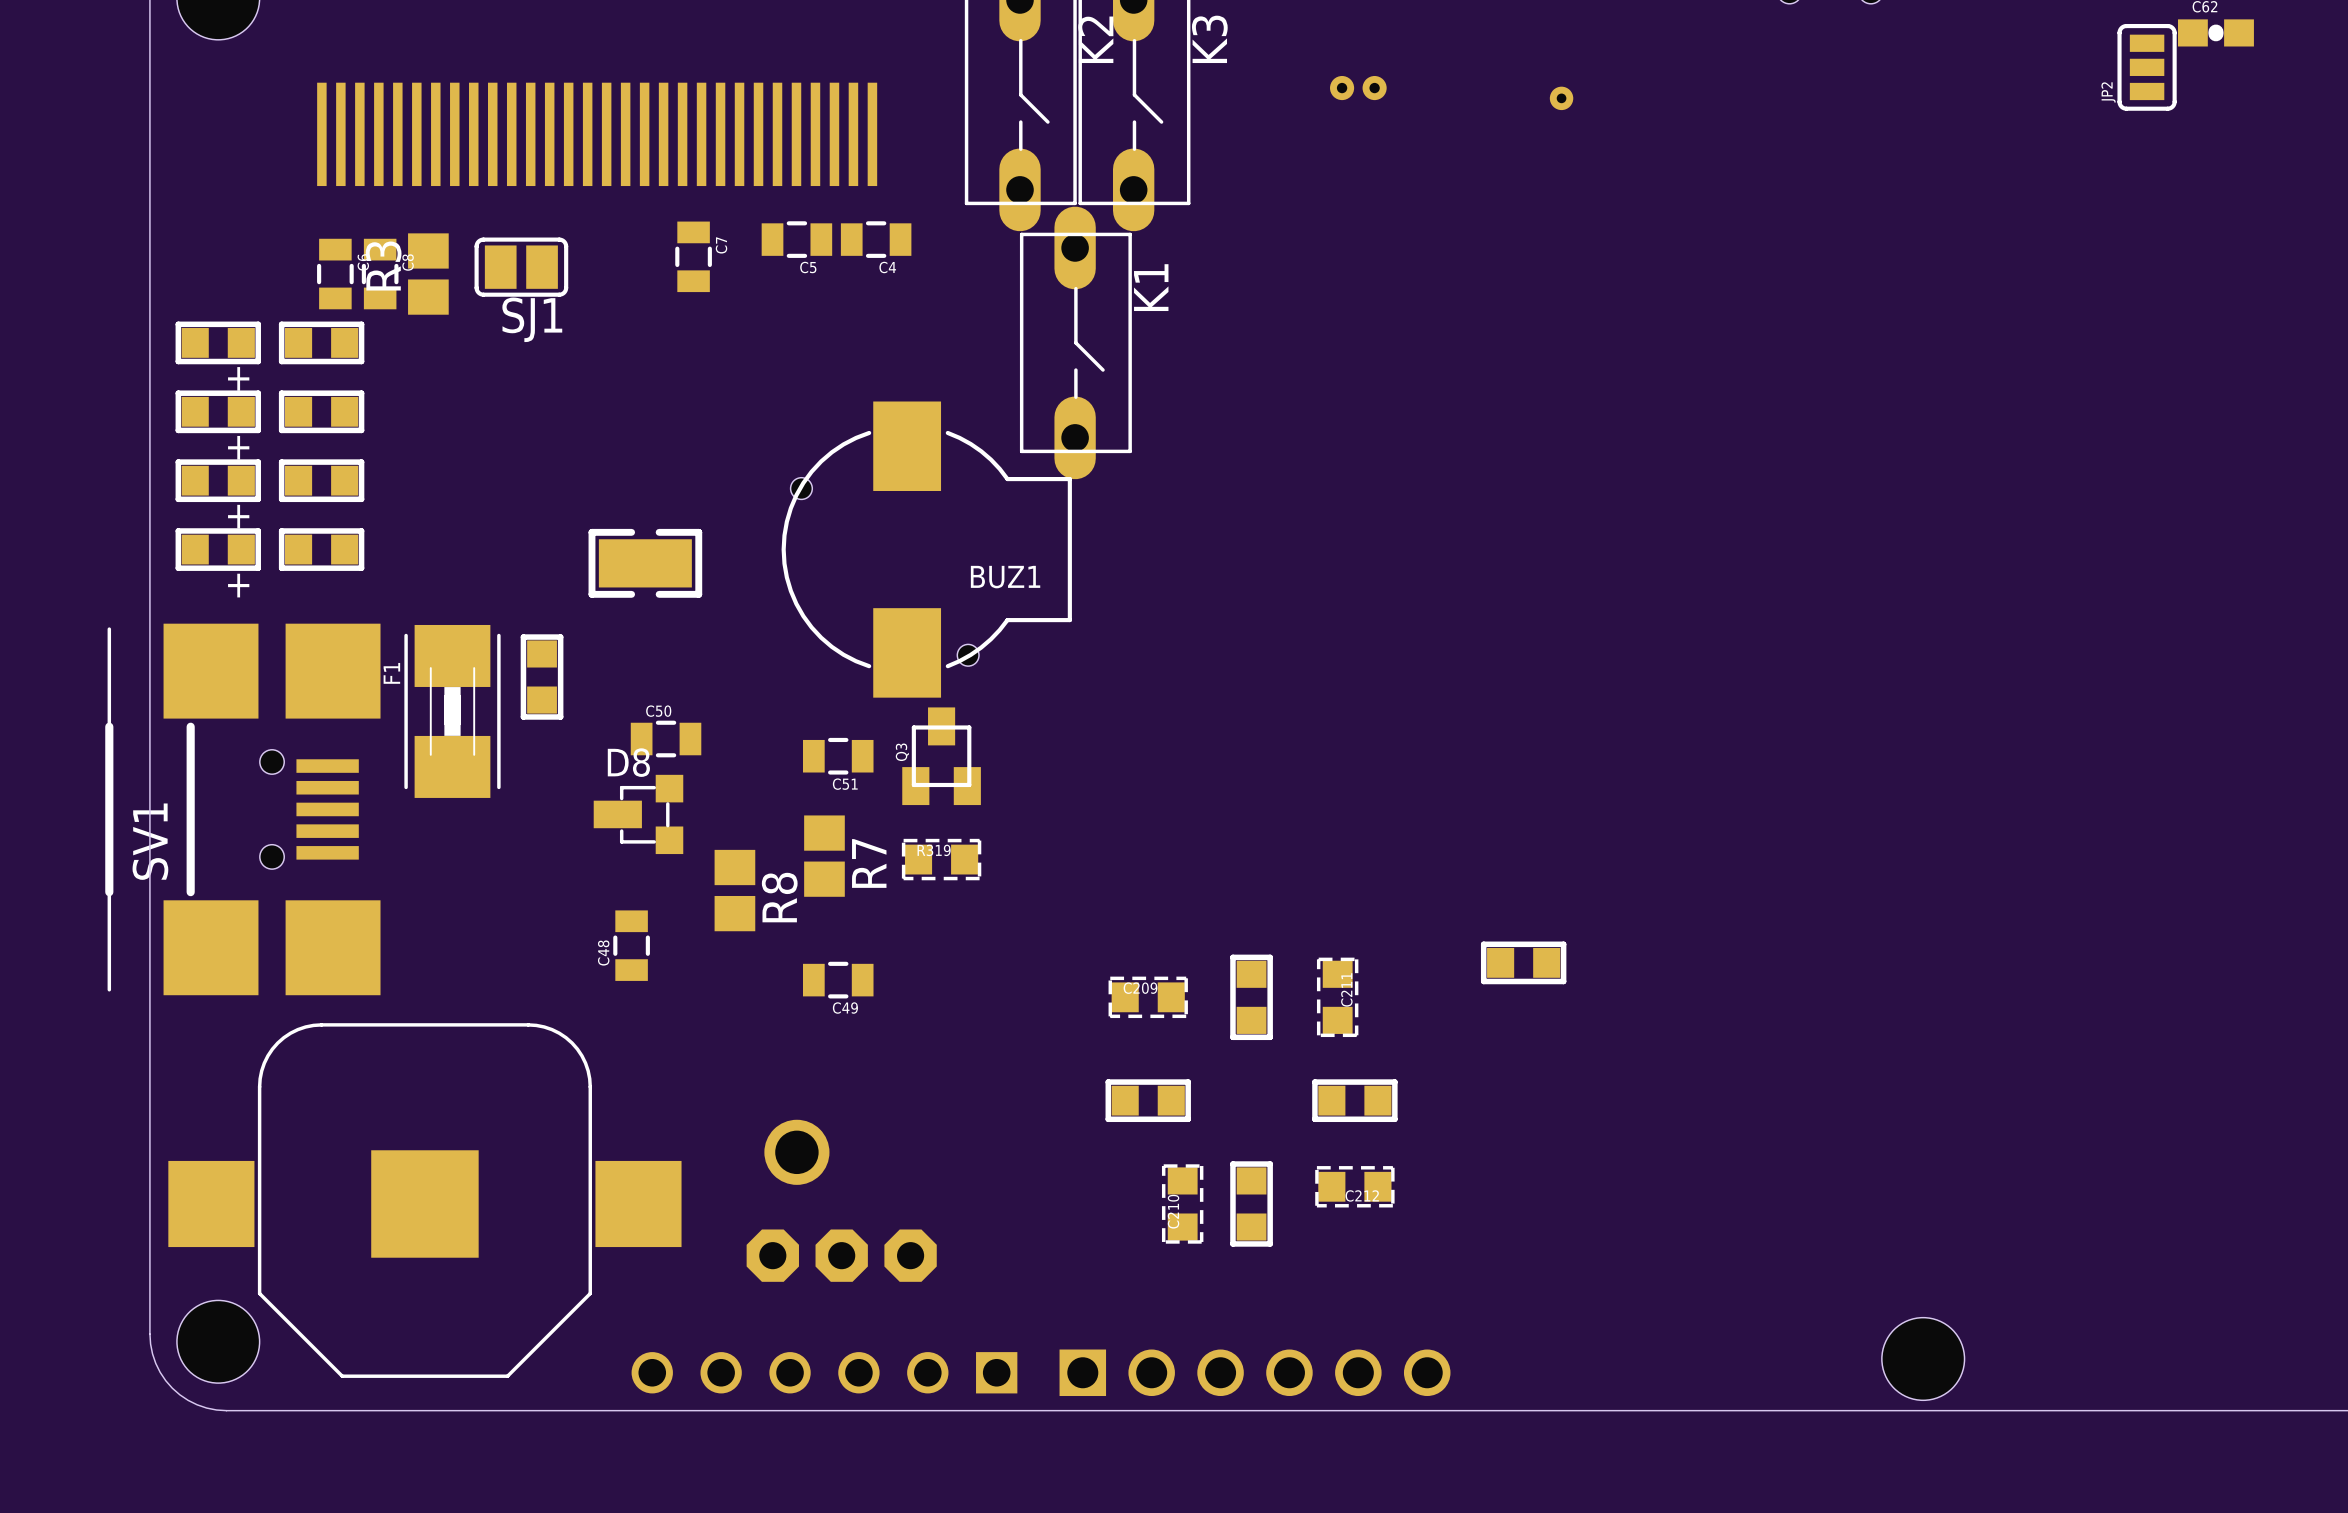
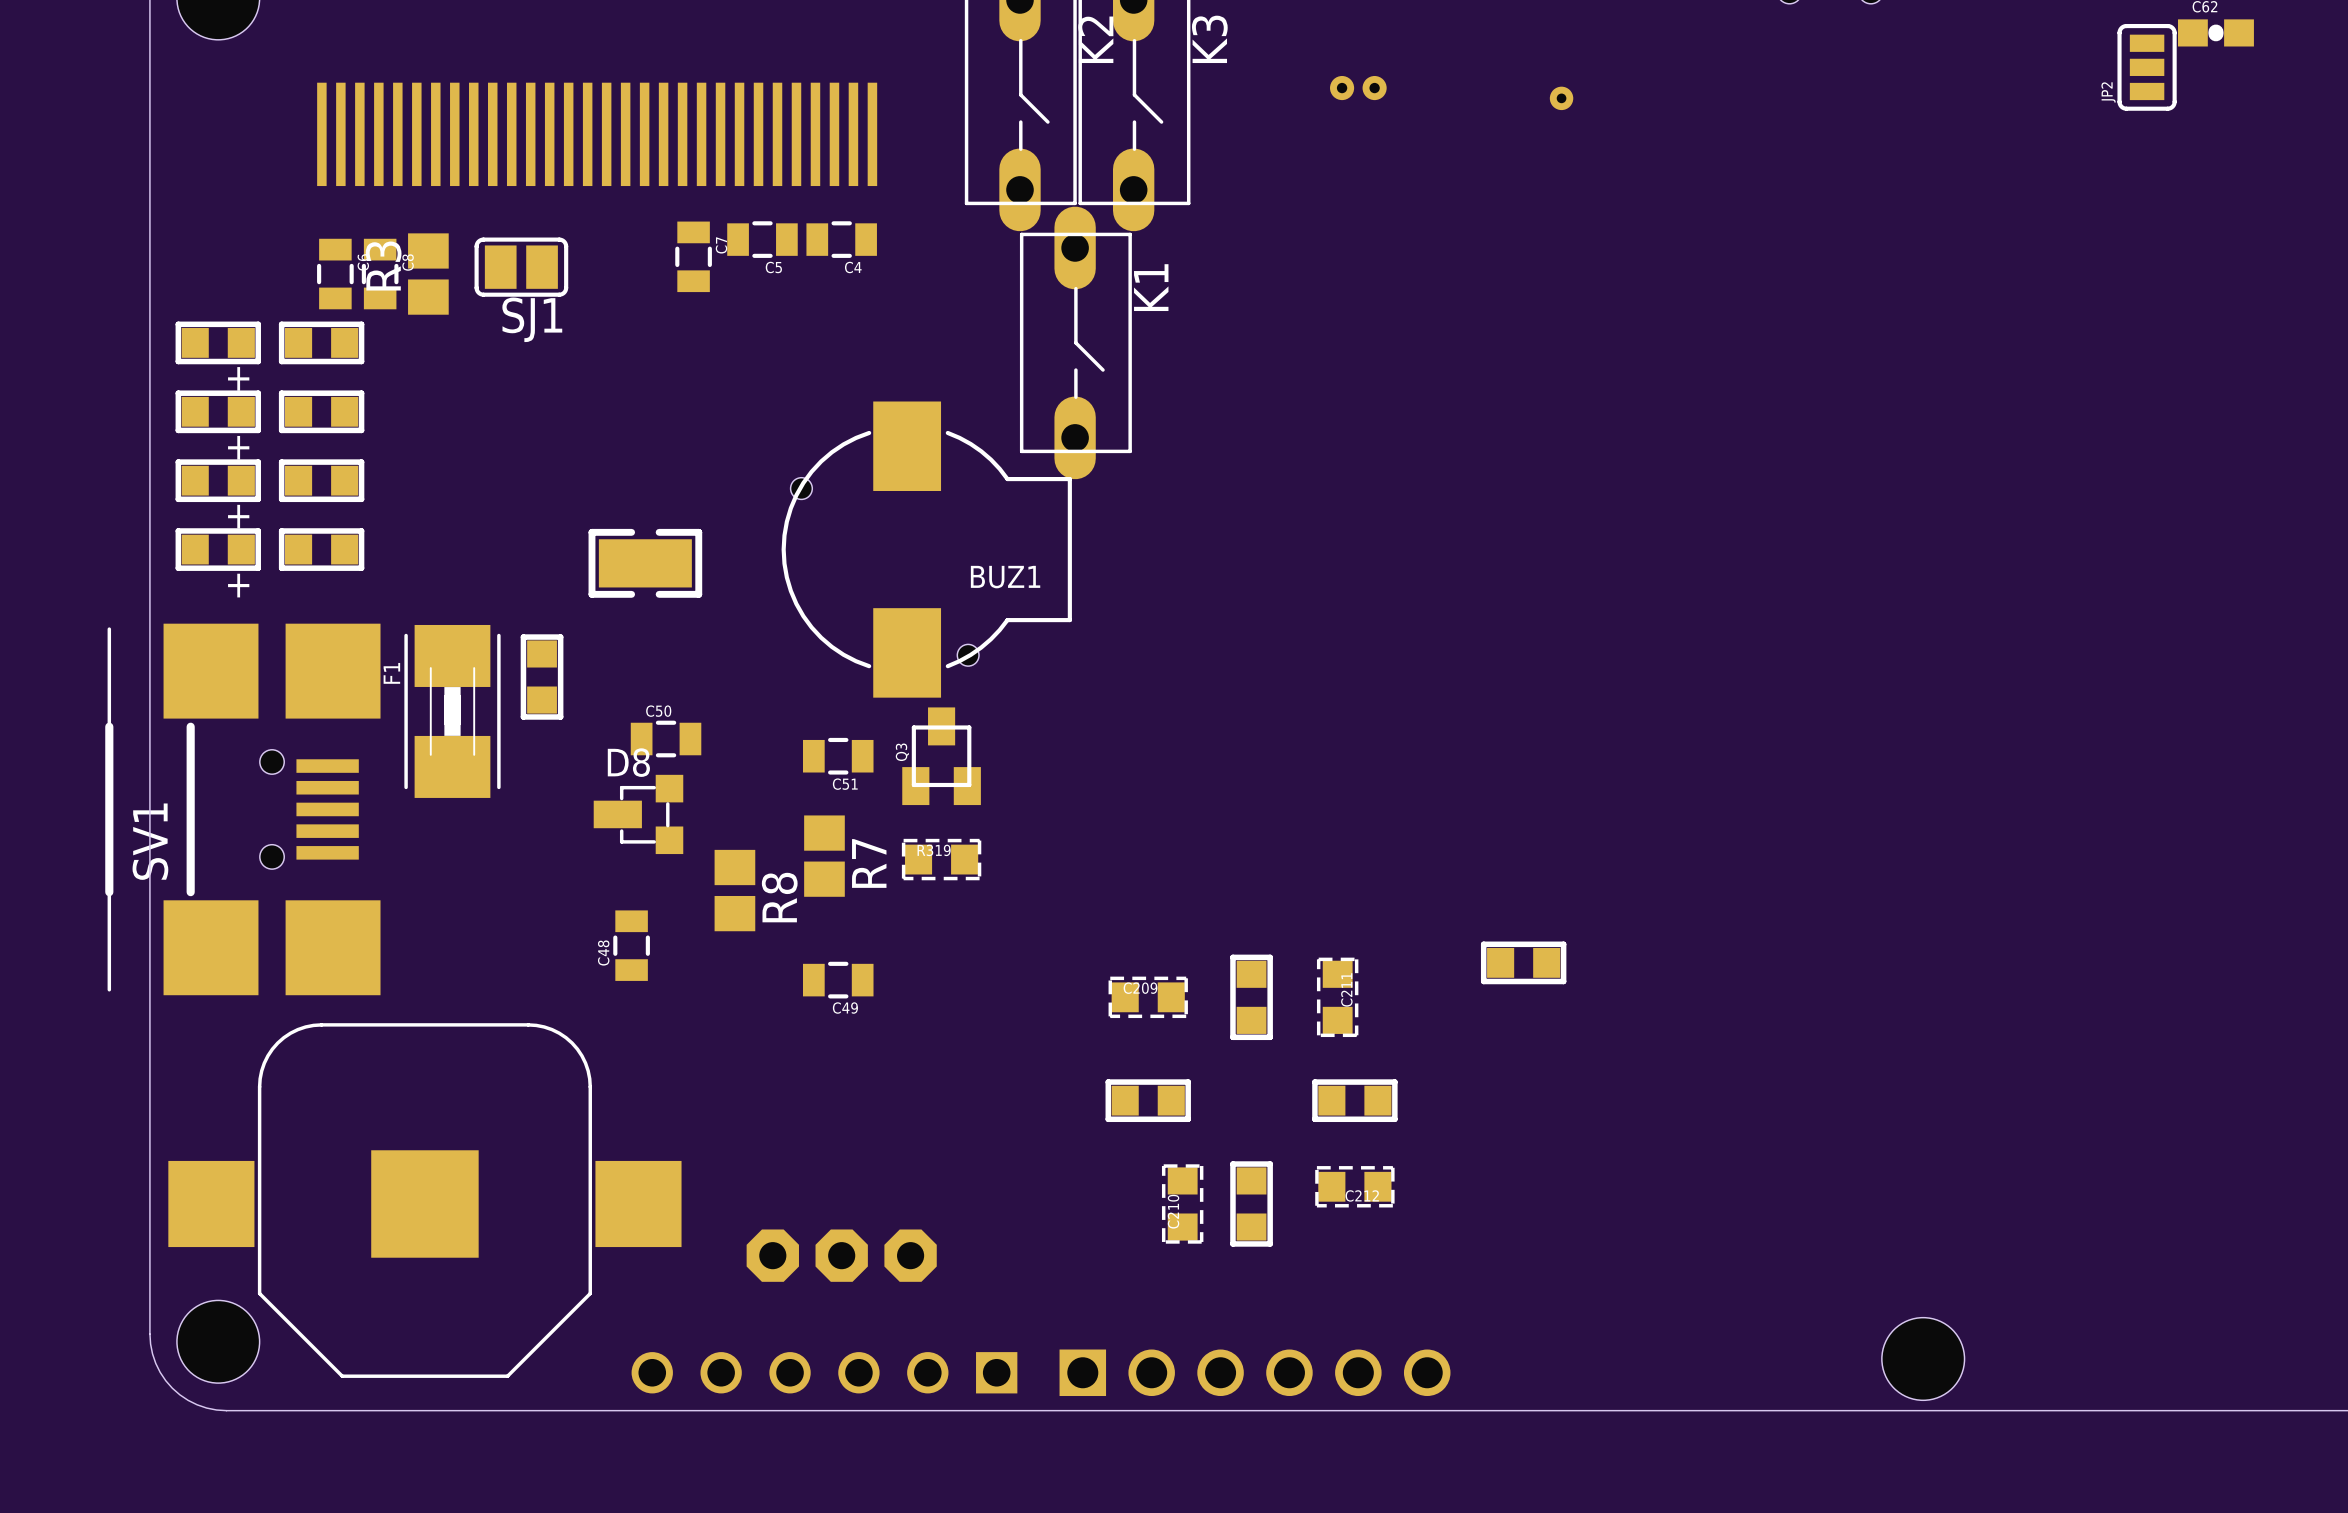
C5 position: (796, 239) -> (762, 239)
C4 position: (876, 239) -> (841, 239)
part: (796, 1152) -> none

